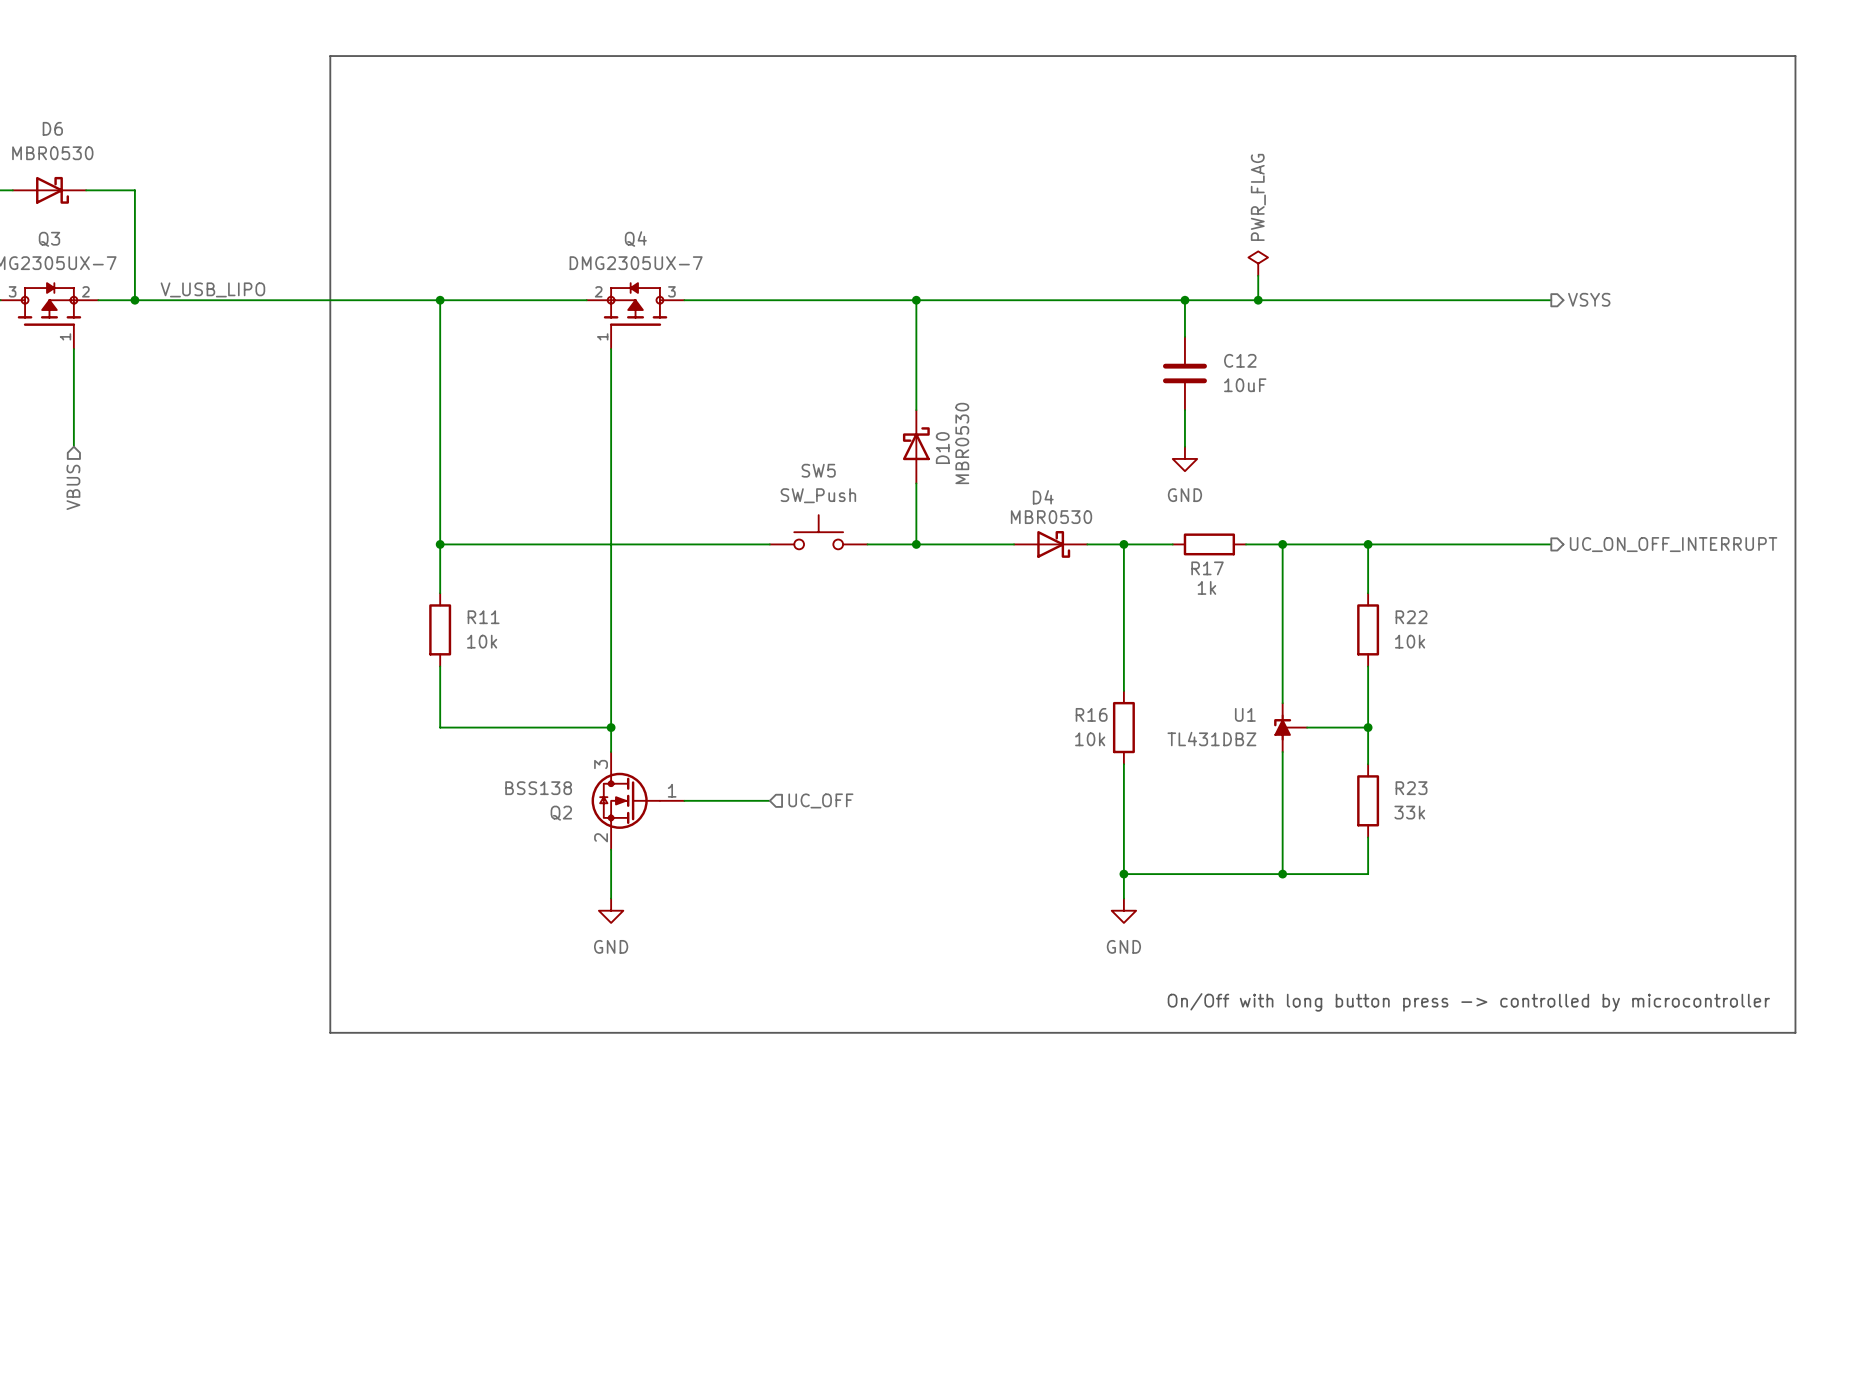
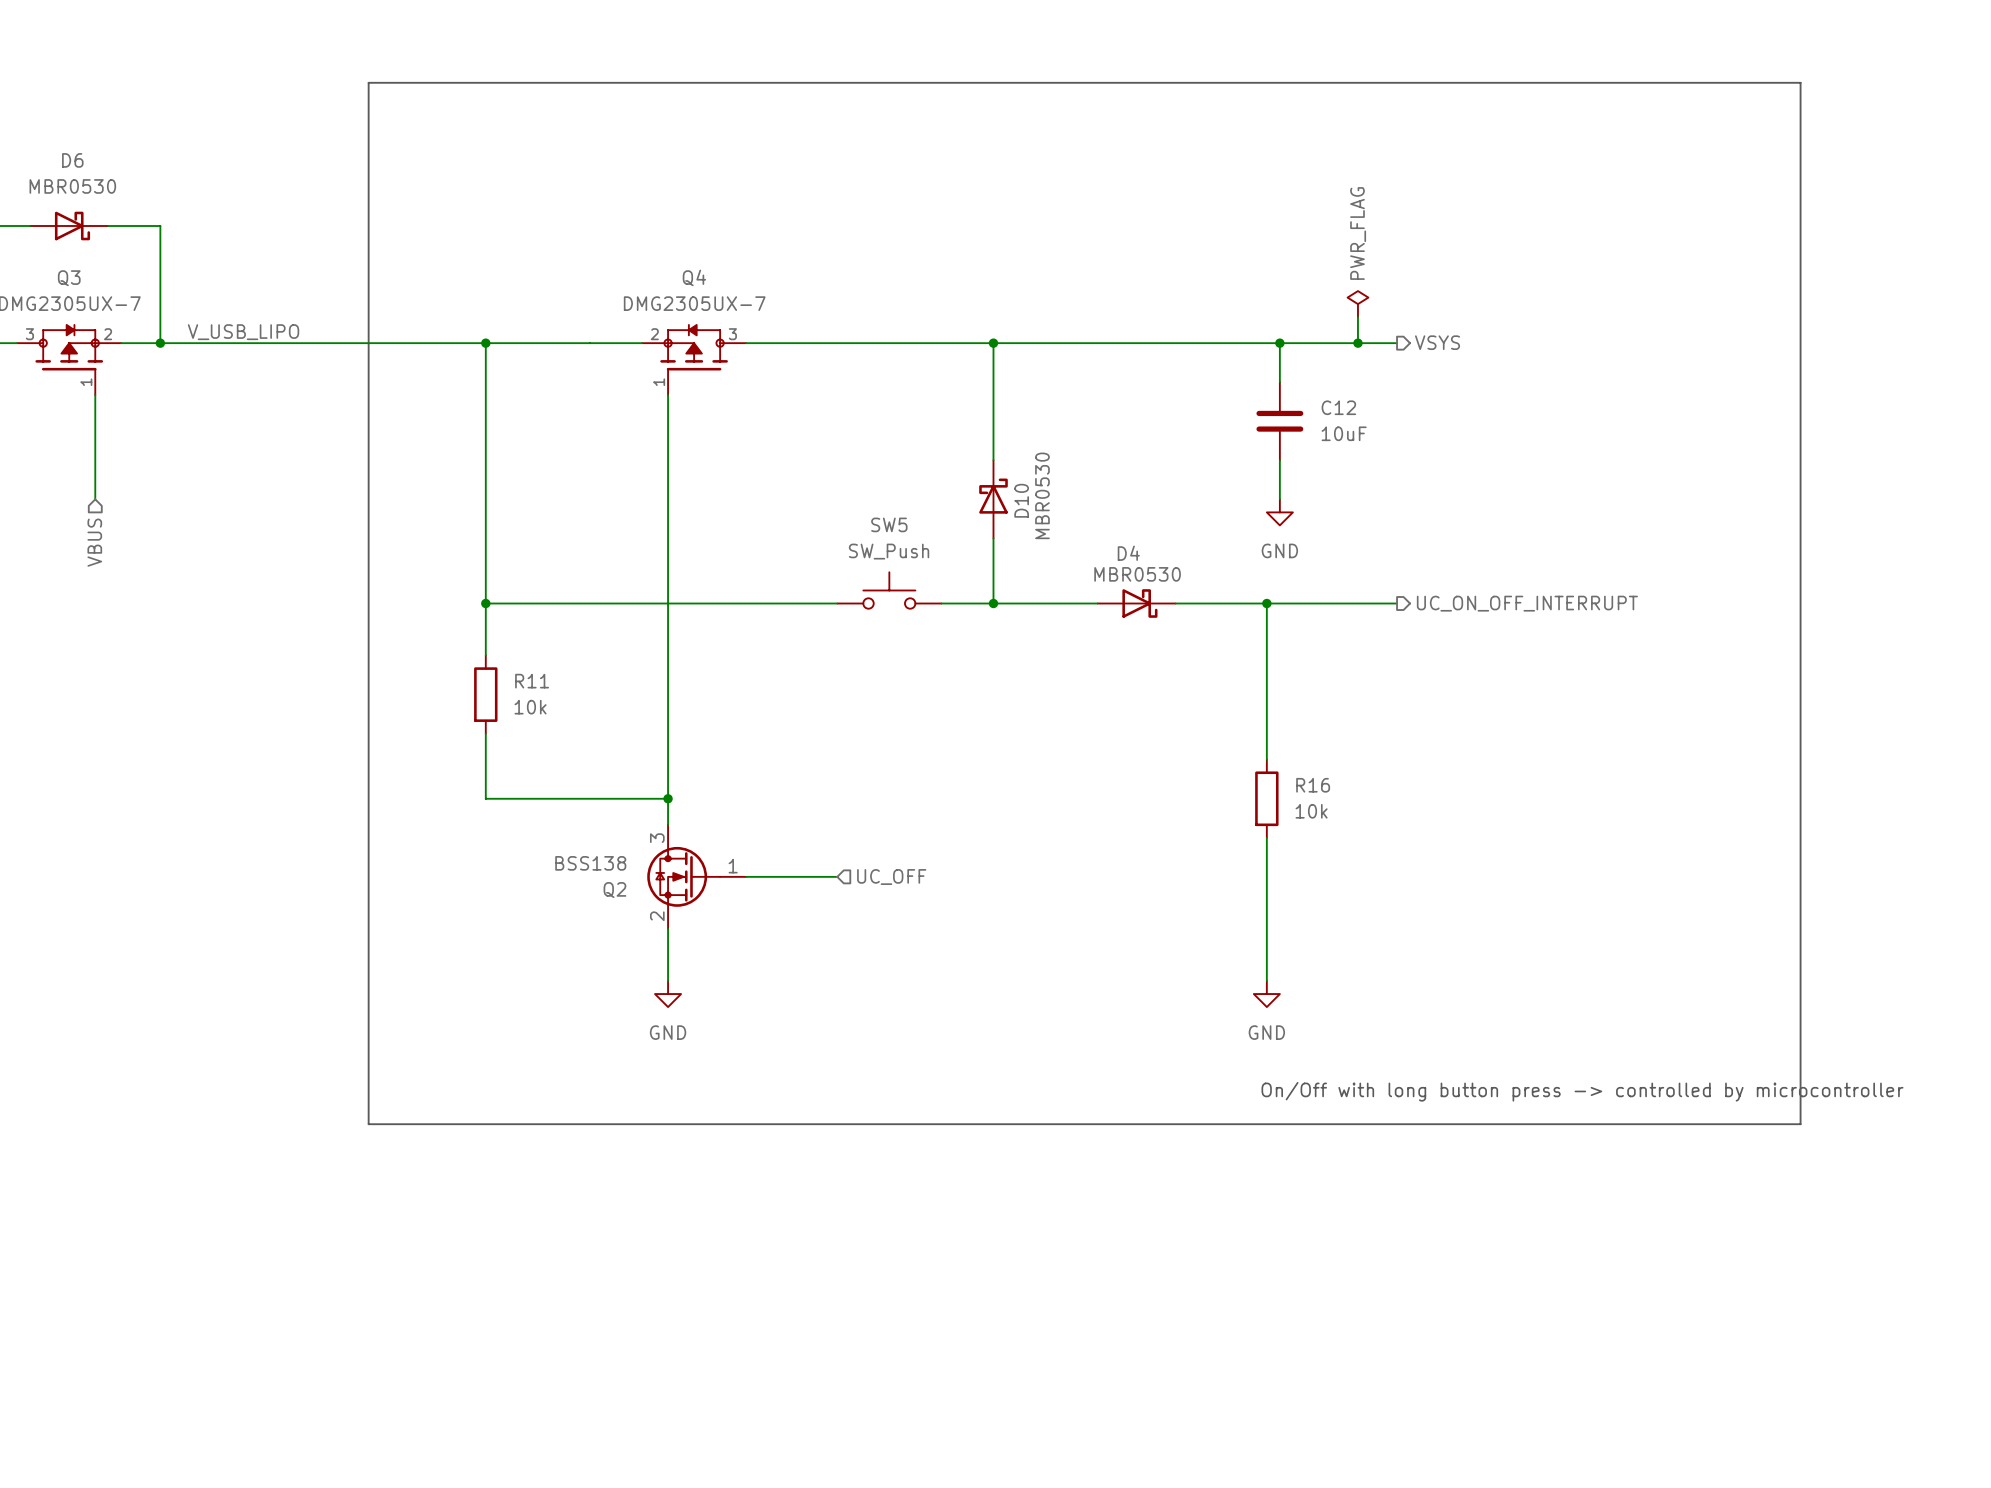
line: (1673, 56) (1795, 56) (1795, 1032) (1673, 1032) -> (1800, 82) (1800, 1124)
hierarchical label: none -> VSYS (1437, 342)
hierarchical label: VSYS (1589, 299) -> none
wire: (1294, 300) (1551, 300) -> none
wire: (1123, 544) (1123, 690) -> none
junction position: (1123, 544) -> (1266, 603)
R17: 1k (1209, 544) -> none
wire: none -> (1344, 603) (1266, 603) (1266, 759)
wire: (1282, 544) (1282, 703) -> none
junction: (1282, 544) -> none
wire: (1294, 544) (1551, 544) -> none
wire: (1368, 544) (1368, 593) -> none
junction: (1368, 544) -> none
hierarchical label: none -> UC_ON_OFF_INTERRUPT (1527, 603)
hierarchical label: UC_ON_OFF_INTERRUPT (1673, 544) -> none
R22: 10k (1368, 629) -> none
wire: (1368, 666) (1368, 764) -> none
R16 name position: R16 (1091, 714) -> R16 (1313, 785)
R16 position: (1123, 727) -> (1266, 798)
U1: TL431DBZ (1290, 727) -> none
wire: (1307, 727) (1368, 727) -> none
junction: (1368, 727) -> none
R16 value position: 10k (1090, 739) -> 10k (1311, 811)
wire: (1282, 751) (1282, 874) -> none
wire: (1123, 764) (1123, 898) -> (1266, 837) (1266, 981)
R23: 33k (1368, 800) -> none
wire: (1368, 837) (1368, 874) (1123, 874) -> none
junction: (1123, 874) -> none
junction: (1282, 874) -> none
power symbol position: GND (1123, 910) -> GND (1266, 994)

